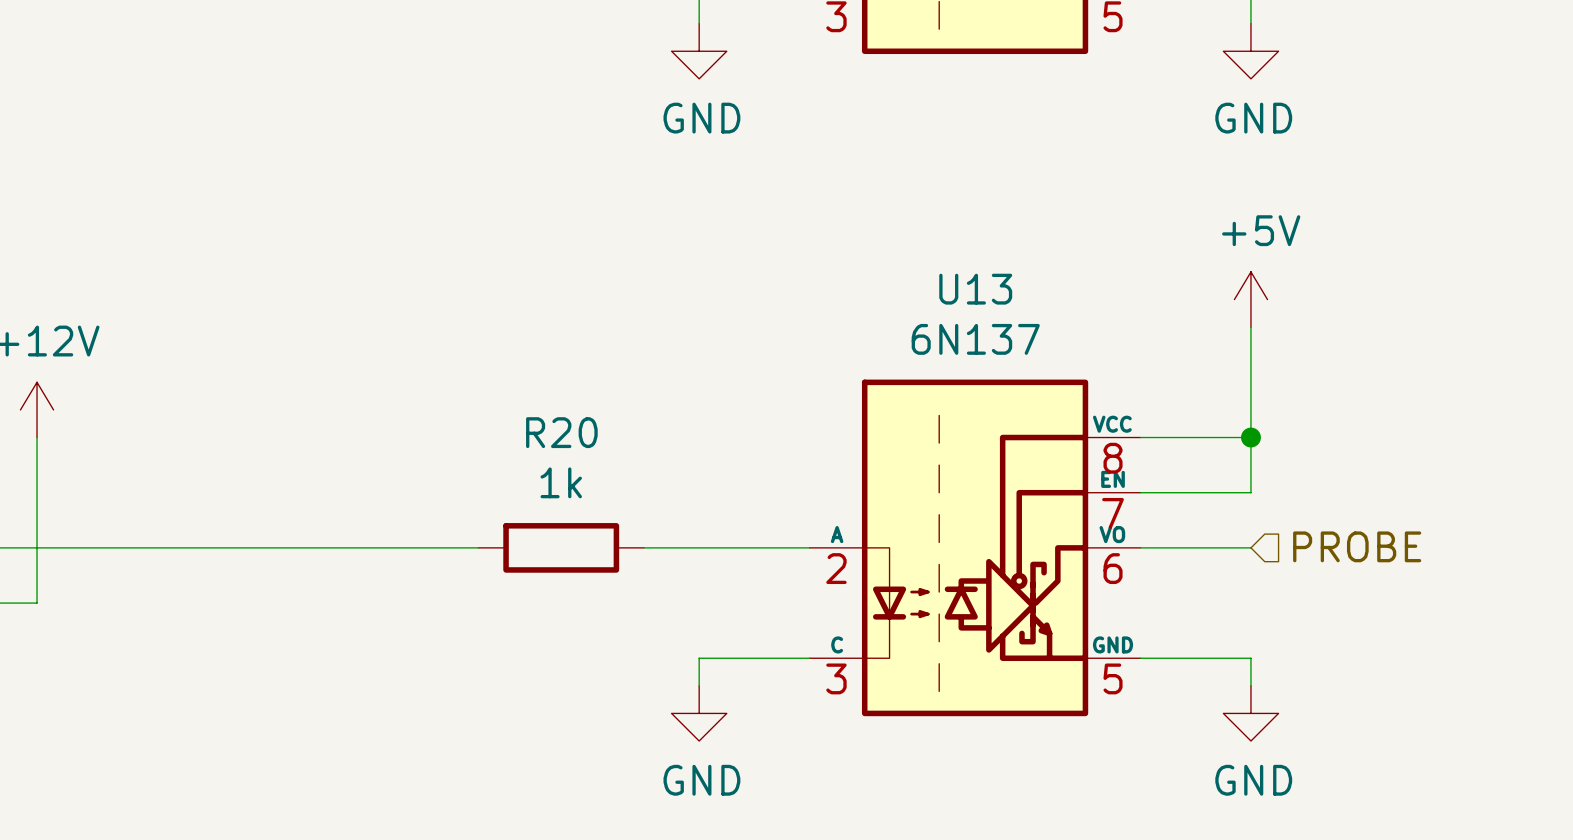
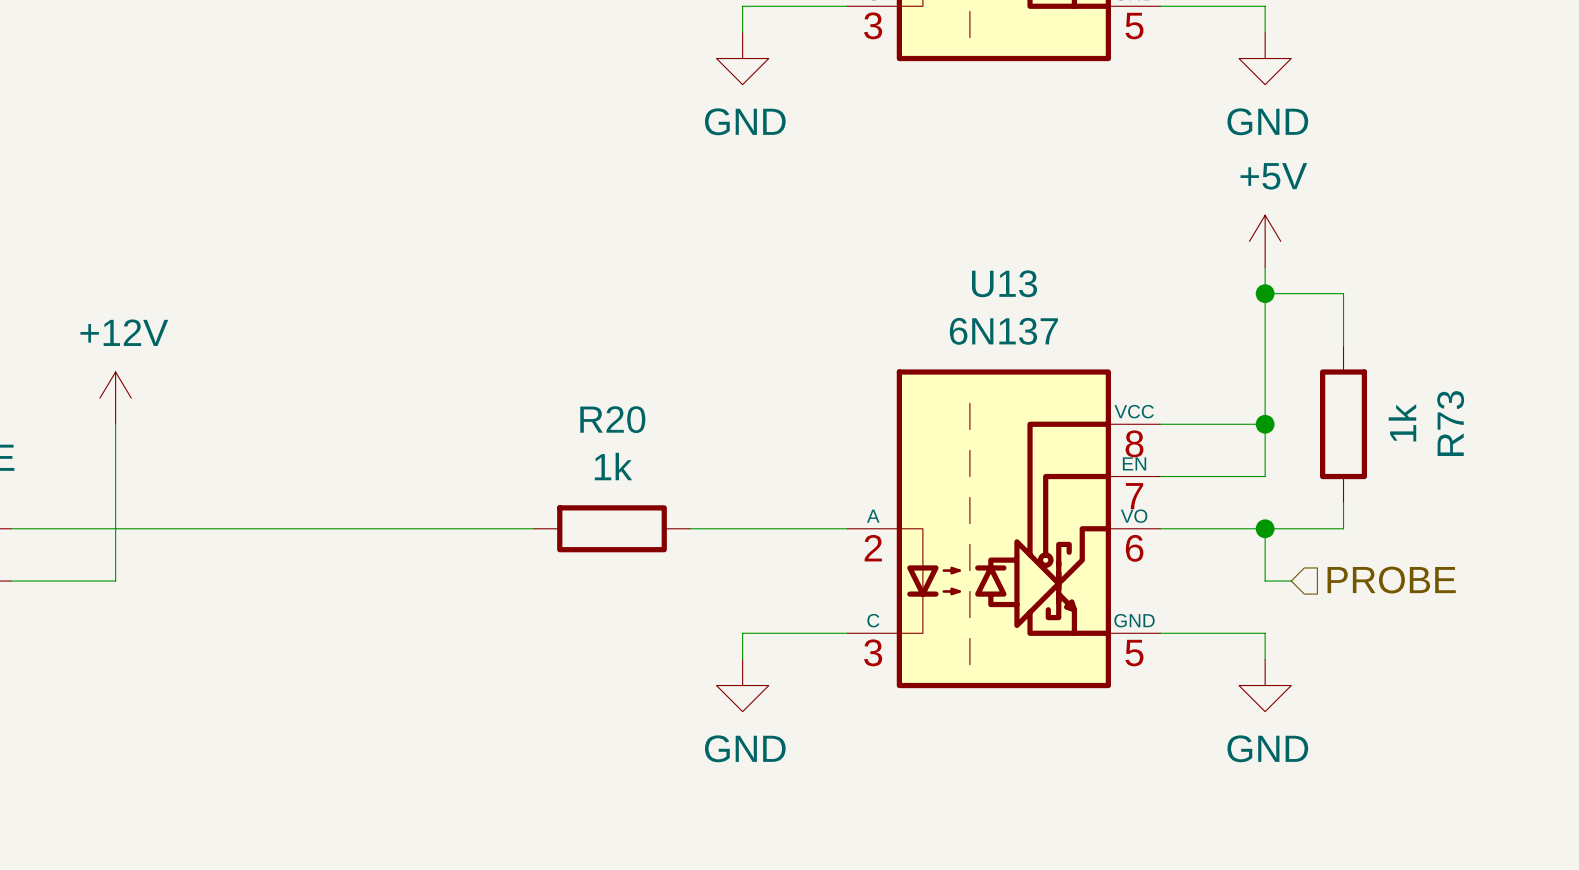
wire: none -> (1265, 293) (1343, 293) (1343, 345)
power symbol position: +5V (1250, 299) -> +5V (1265, 241)
junction: none -> (1265, 293)
R73: none -> 1k (1343, 424)
wire: none -> (1343, 502) (1343, 528) (1265, 528) (1265, 581) (1291, 581)
hierarchical label position: PROBE (1357, 546) -> PROBE (1391, 580)
junction: none -> (1265, 528)

